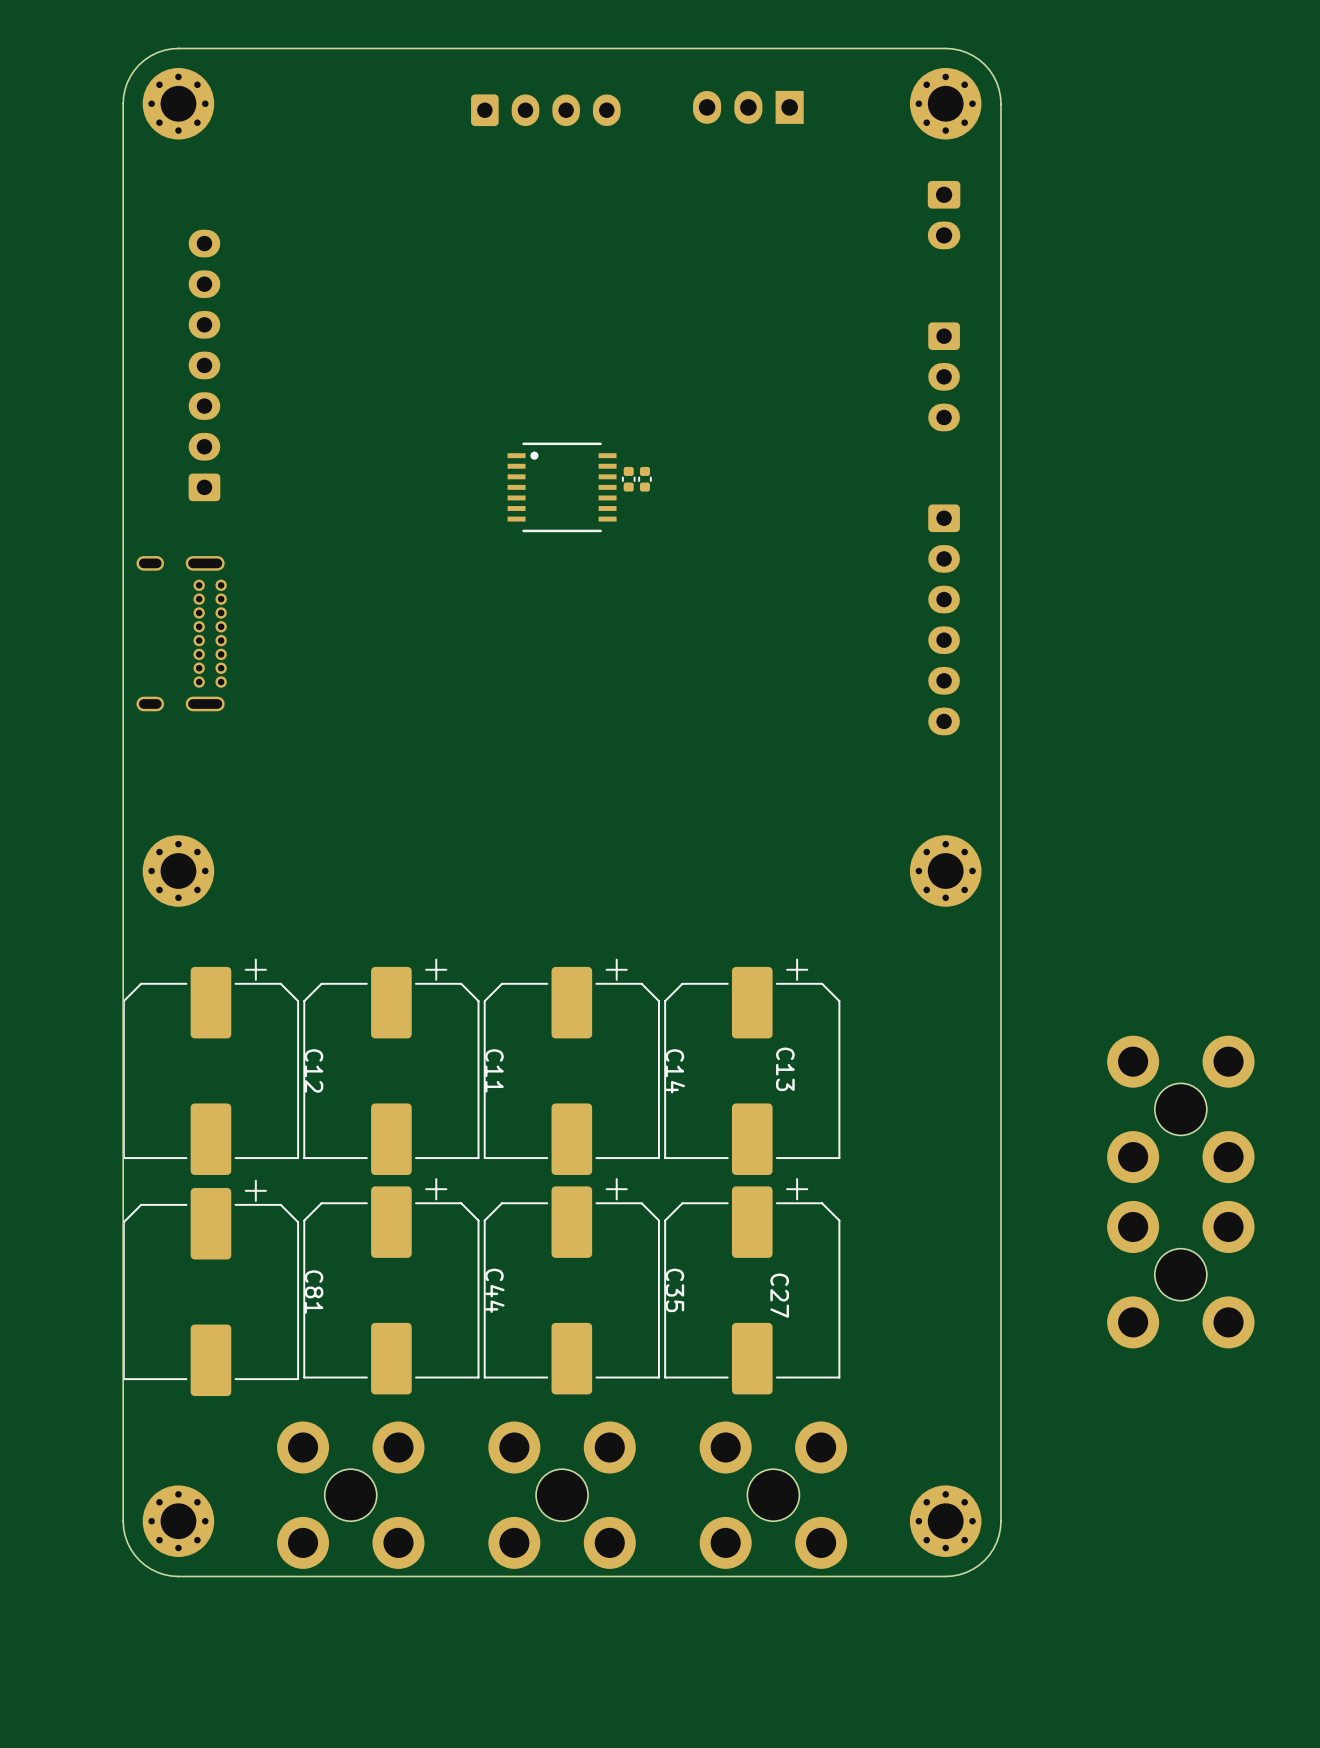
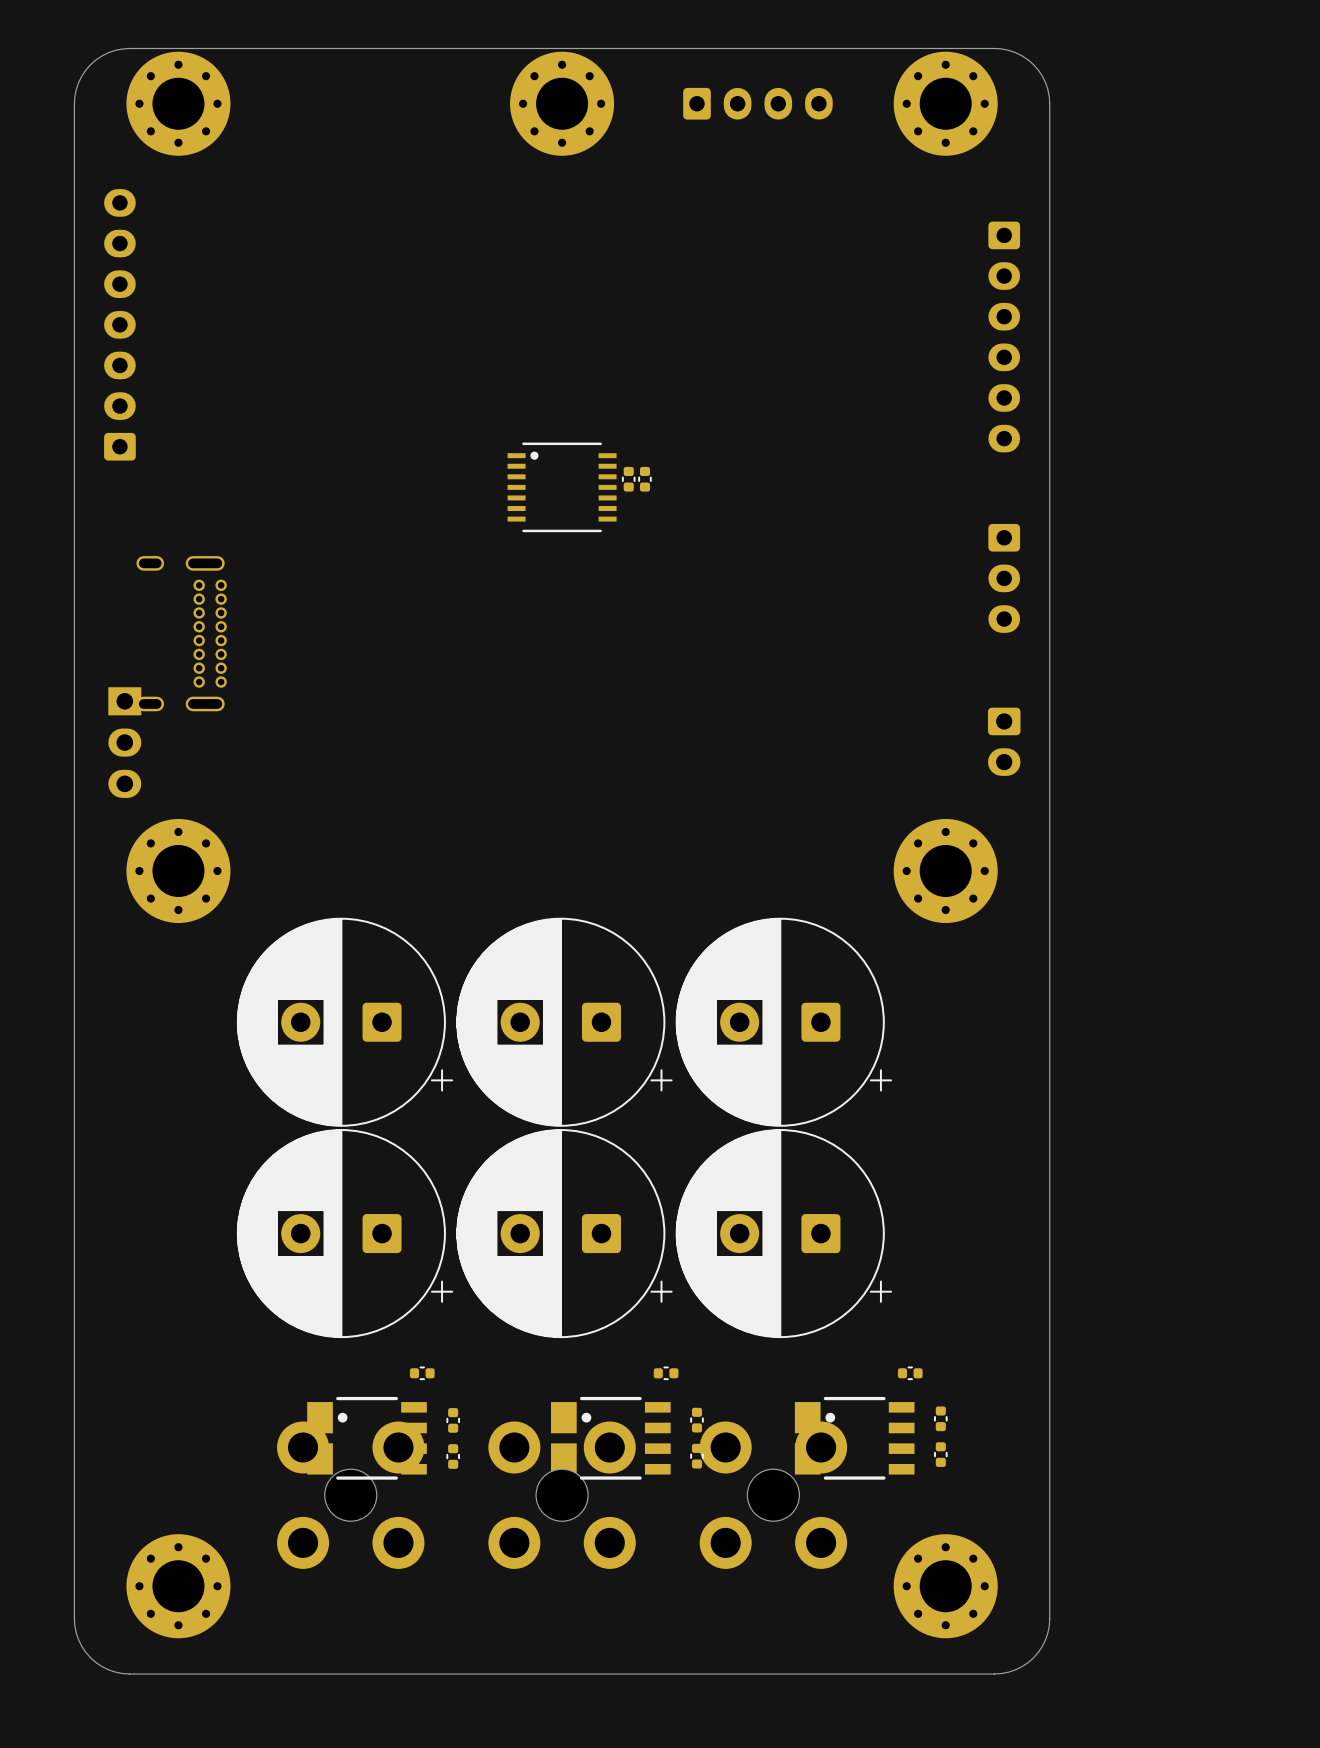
board edge: (945, 48) (966, 52) (984, 64) (996, 82) (1000, 103) (1000, 1521) (996, 1542) (984, 1560) (966, 1572) (945, 1576) (178, 1576) (164, 1574) (150, 1569) (139, 1560) (130, 1548) (125, 1535) (123, 1521) (123, 103) (127, 82) (139, 64) (157, 52) (178, 48) -> (945, 48) (1001, 48) (1022, 55) (1033, 64) (1042, 76) (1047, 89) (1049, 103) (1049, 1618) (1045, 1639) (1033, 1657) (1015, 1669) (994, 1674) (129, 1674) (115, 1672) (102, 1666) (90, 1657) (81, 1646) (76, 1633) (74, 1618) (74, 103) (76, 89) (81, 76) (90, 64) (102, 55) (122, 48) (178, 48)
part footprint: [142, 67, 215, 140] -> [126, 51, 231, 156]
part footprint: [909, 67, 982, 140] -> [893, 51, 998, 156]
part footprint: [693, 90, 804, 124] -> [683, 87, 833, 120]
part: none -> (562, 103)
part: (545, 110) -> none
part: (944, 215) -> none
part position: (204, 365) -> (119, 324)
part position: (944, 376) -> (1004, 578)
part position: (944, 619) -> (1004, 337)
part: none -> (1004, 741)
part: none -> (124, 742)
part footprint: [142, 835, 215, 907] -> [126, 818, 231, 924]
part footprint: [909, 835, 982, 907] -> [893, 818, 998, 924]
part: none -> (345, 1022)
part: none -> (564, 1022)
part: none -> (783, 1022)
C12: (210, 1066) -> none
C11: (391, 1066) -> none
C14: (571, 1066) -> none
C13: (752, 1066) -> none
part: (1180, 1109) -> none
part: none -> (345, 1233)
part: none -> (564, 1233)
part: none -> (783, 1233)
part: (1180, 1274) -> none
C44: (391, 1286) -> none
C35: (571, 1286) -> none
C27: (752, 1286) -> none
C81: (210, 1287) -> none
part: none -> (422, 1373)
part: none -> (666, 1373)
part: none -> (910, 1373)
part: none -> (940, 1418)
part: none -> (453, 1420)
part: none -> (697, 1420)
part: none -> (367, 1438)
part: none -> (610, 1438)
part: none -> (854, 1438)
part: none -> (940, 1454)
part: none -> (453, 1456)
part: none -> (697, 1456)
part: (178, 1521) -> none
part: (945, 1521) -> none
part: none -> (178, 1586)
part: none -> (945, 1586)

